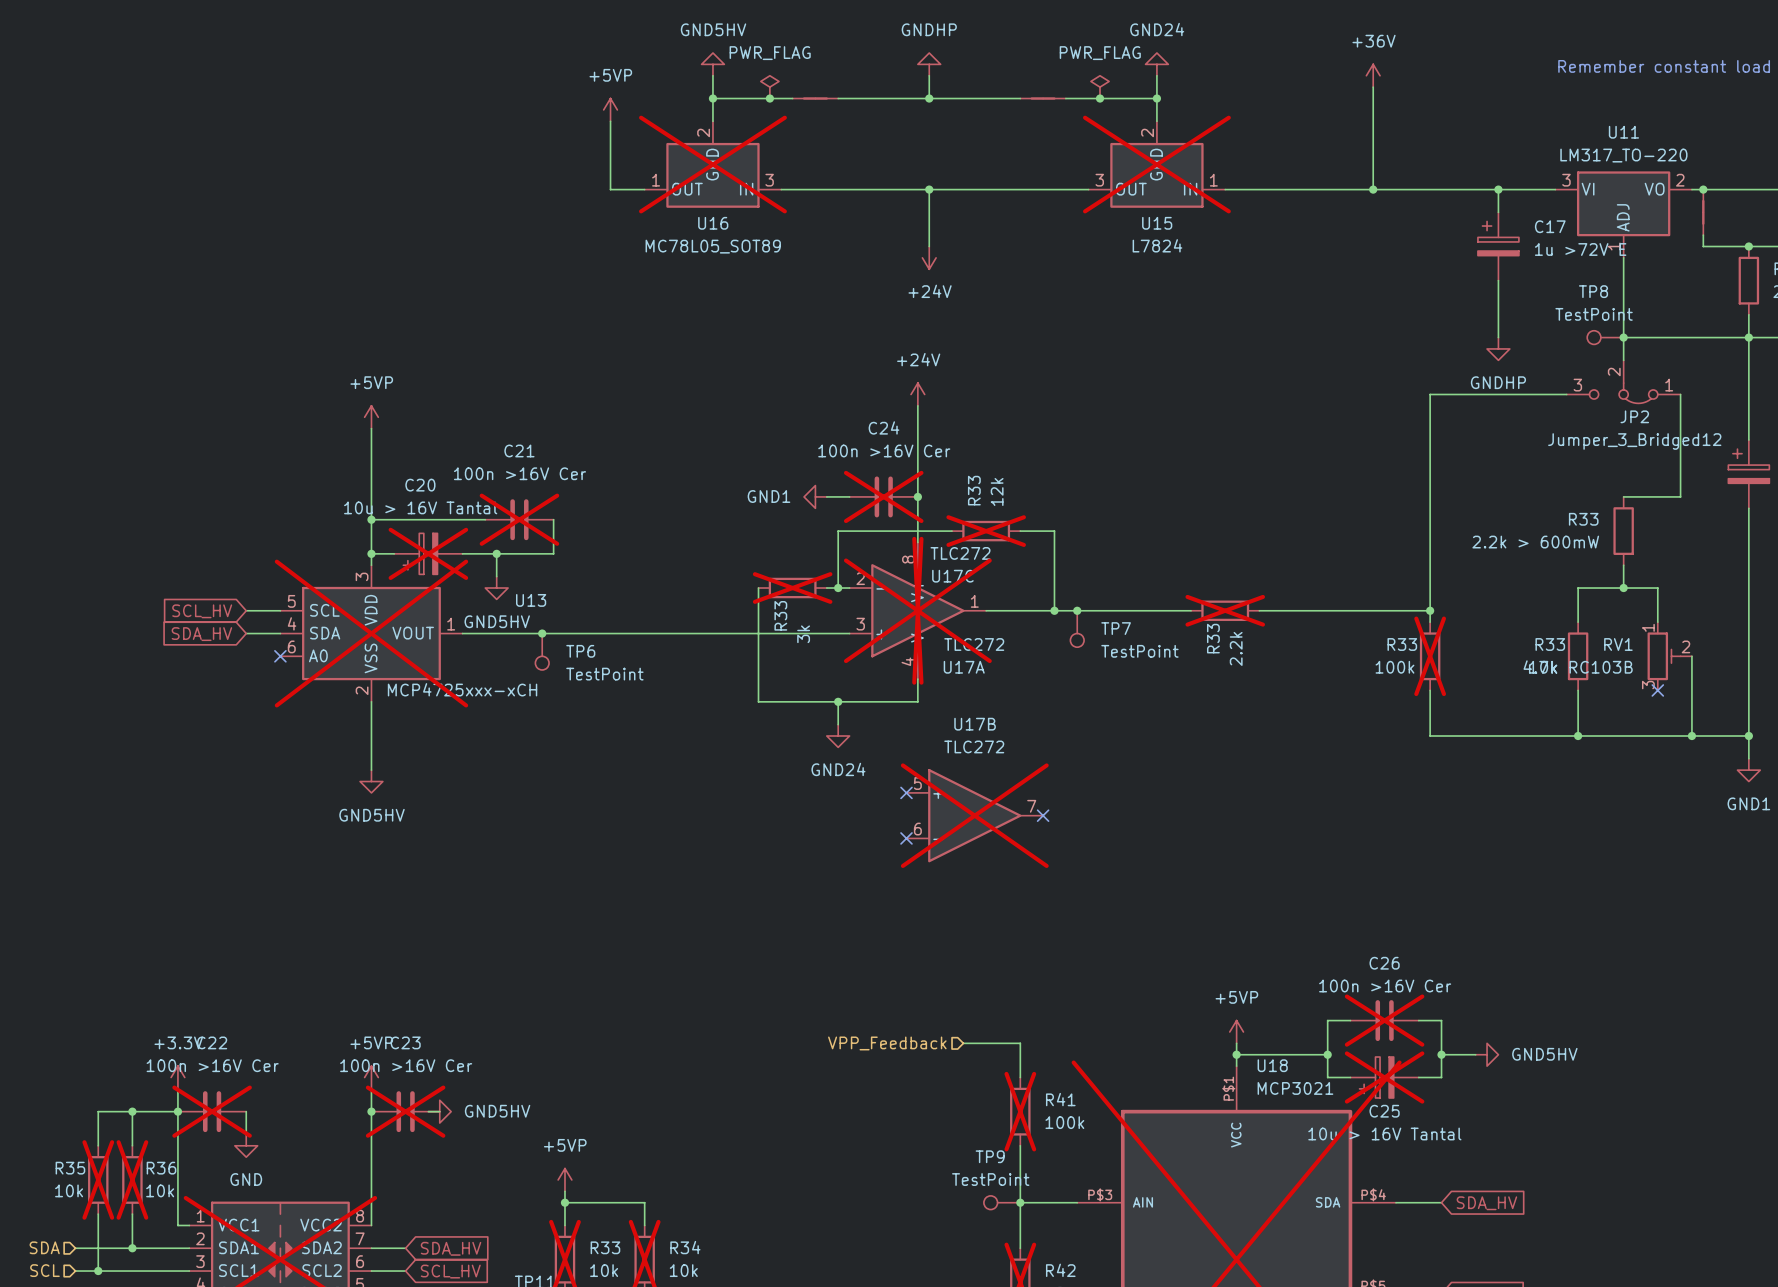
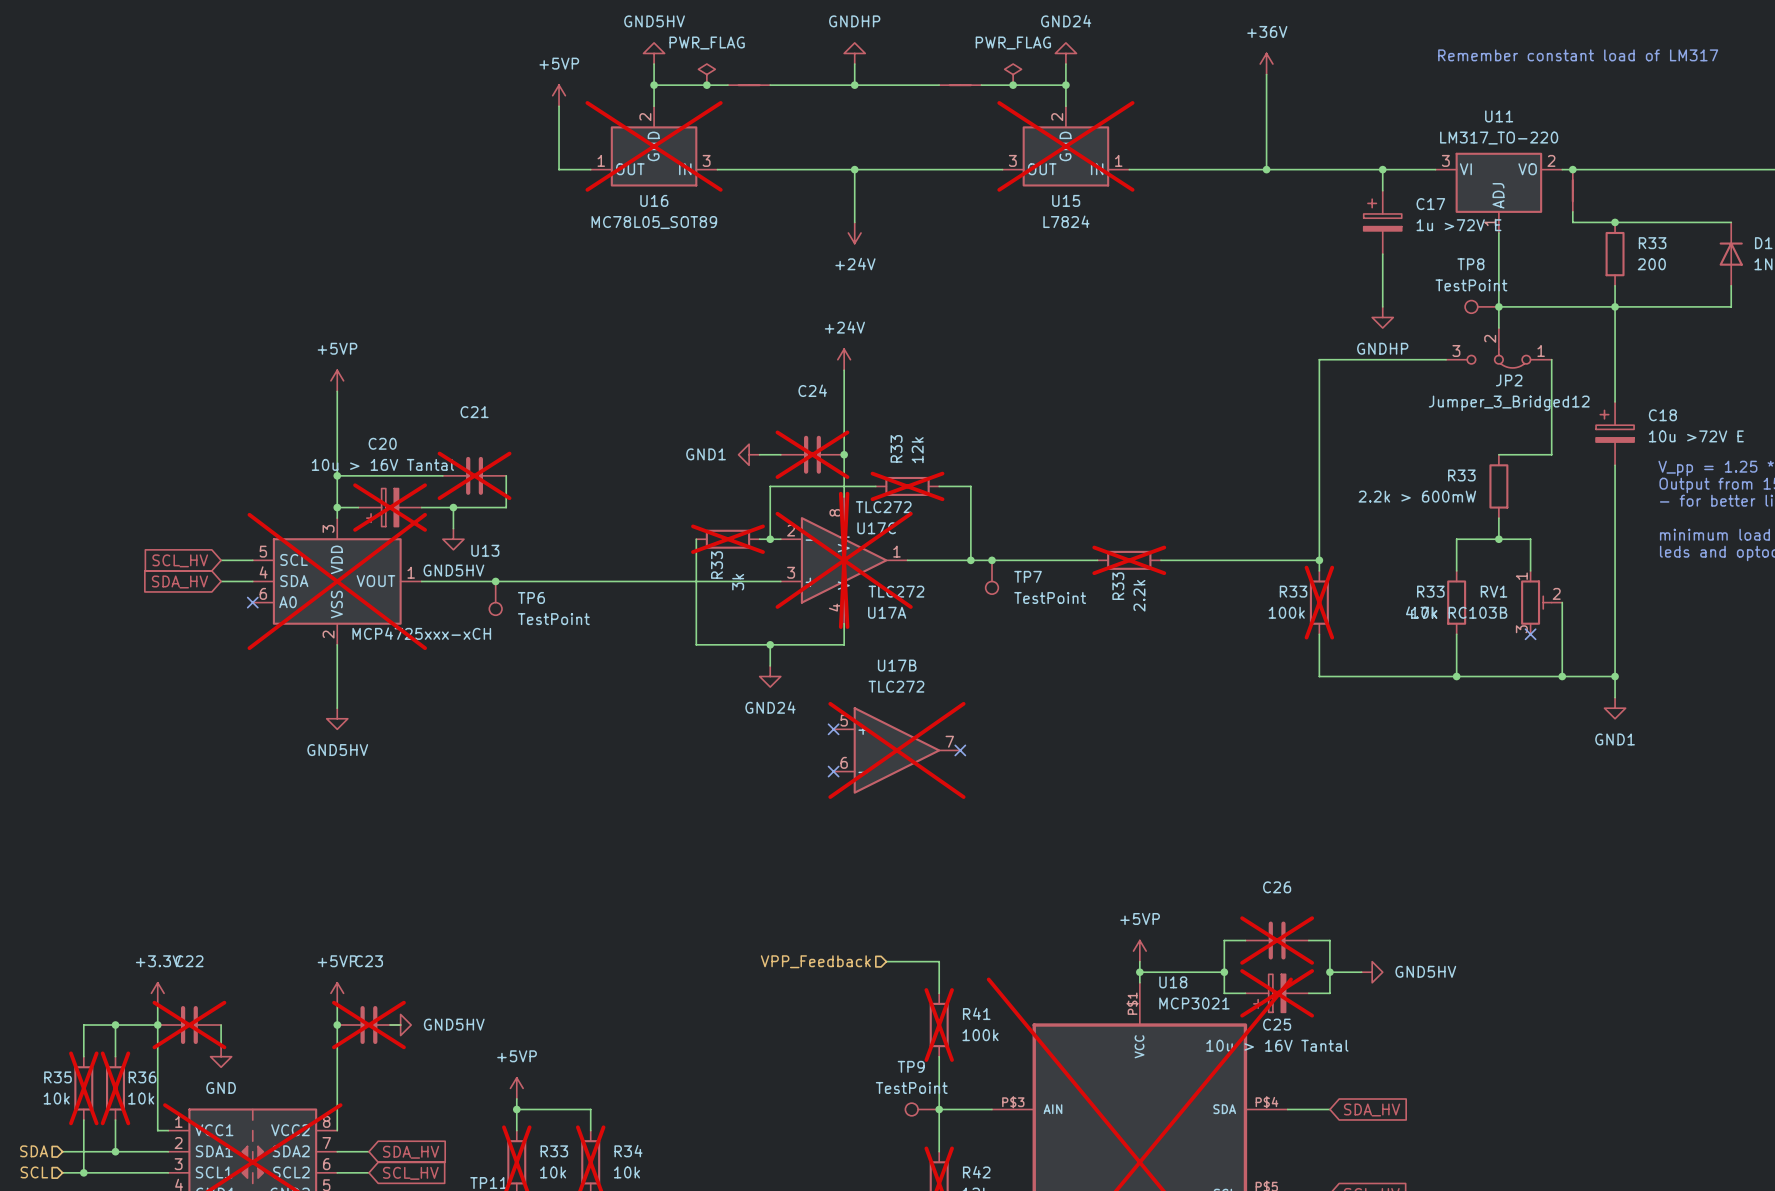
C24 value: 100n >16V Cer (884, 450) -> none
C21 value: 100n >16V Cer (519, 473) -> none
C26 value: 100n >16V Cer (1385, 986) -> none
C22 value: 100n >16V Cer (212, 1065) -> none
C23 value: 100n >16V Cer (406, 1065) -> none

